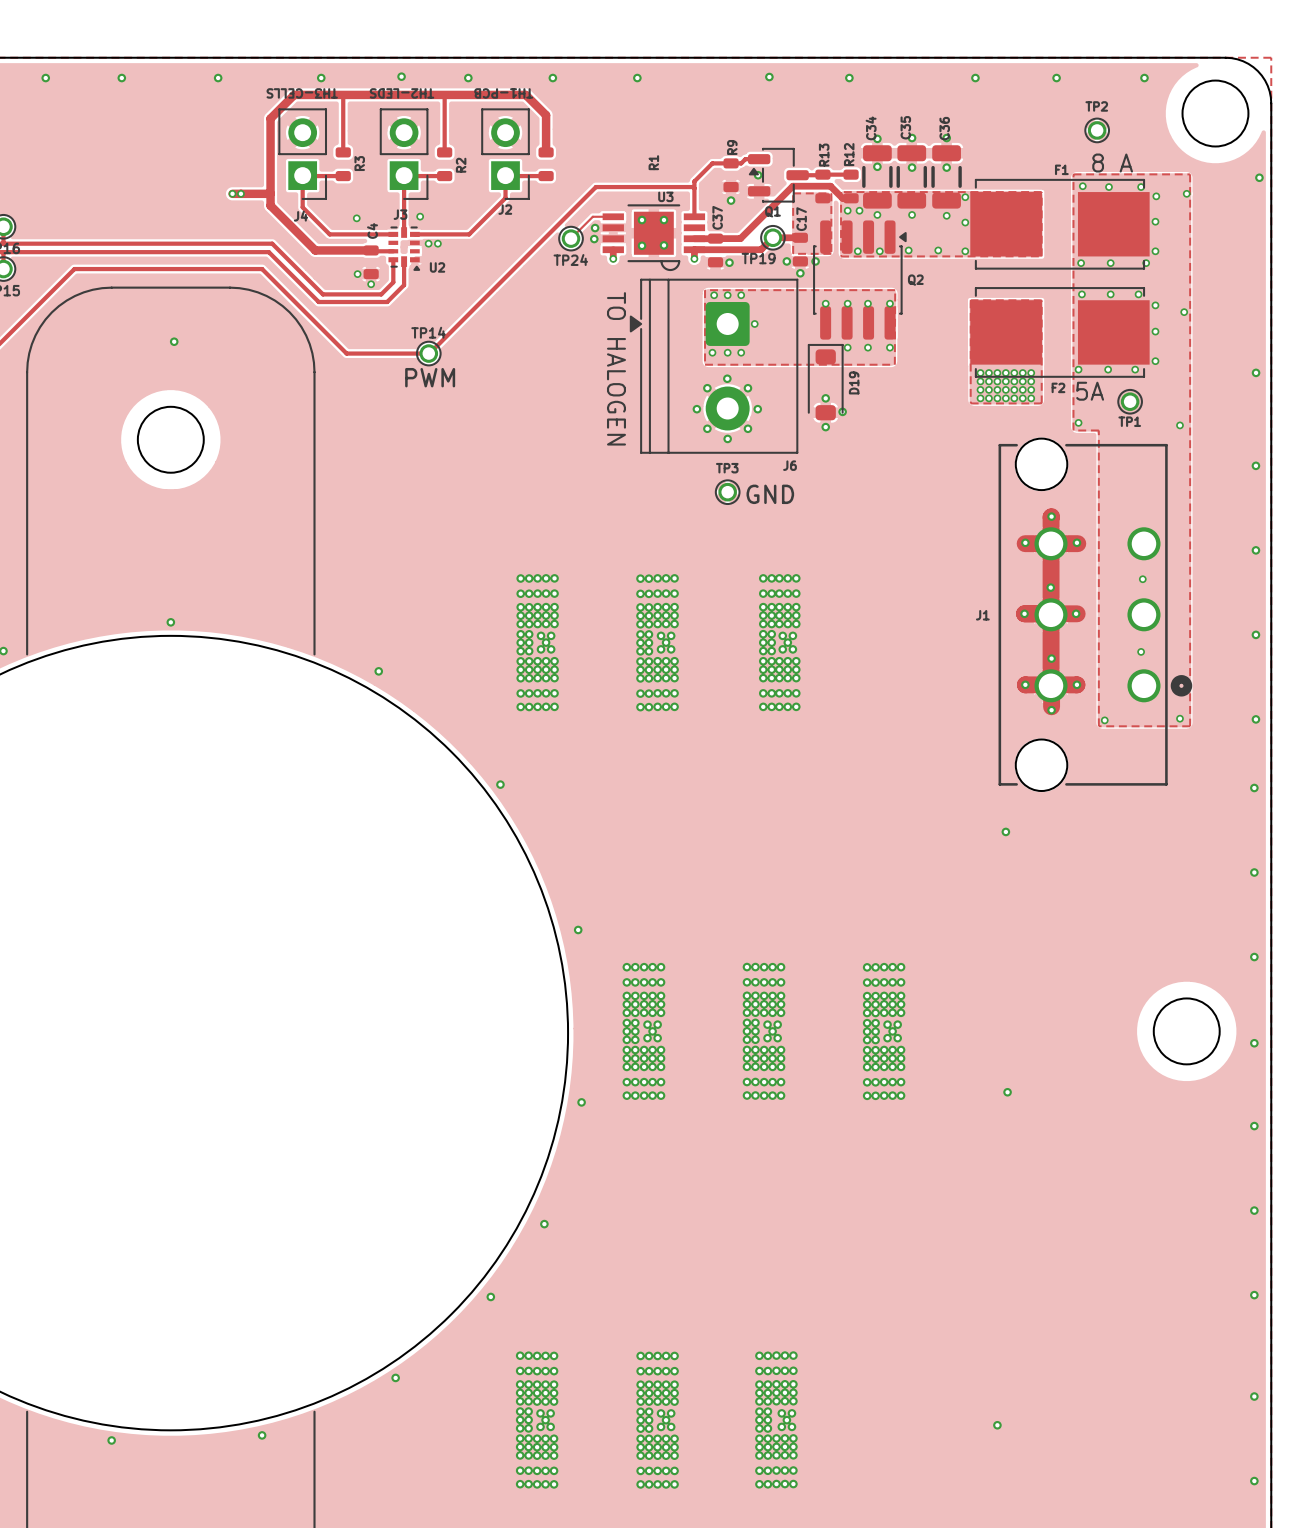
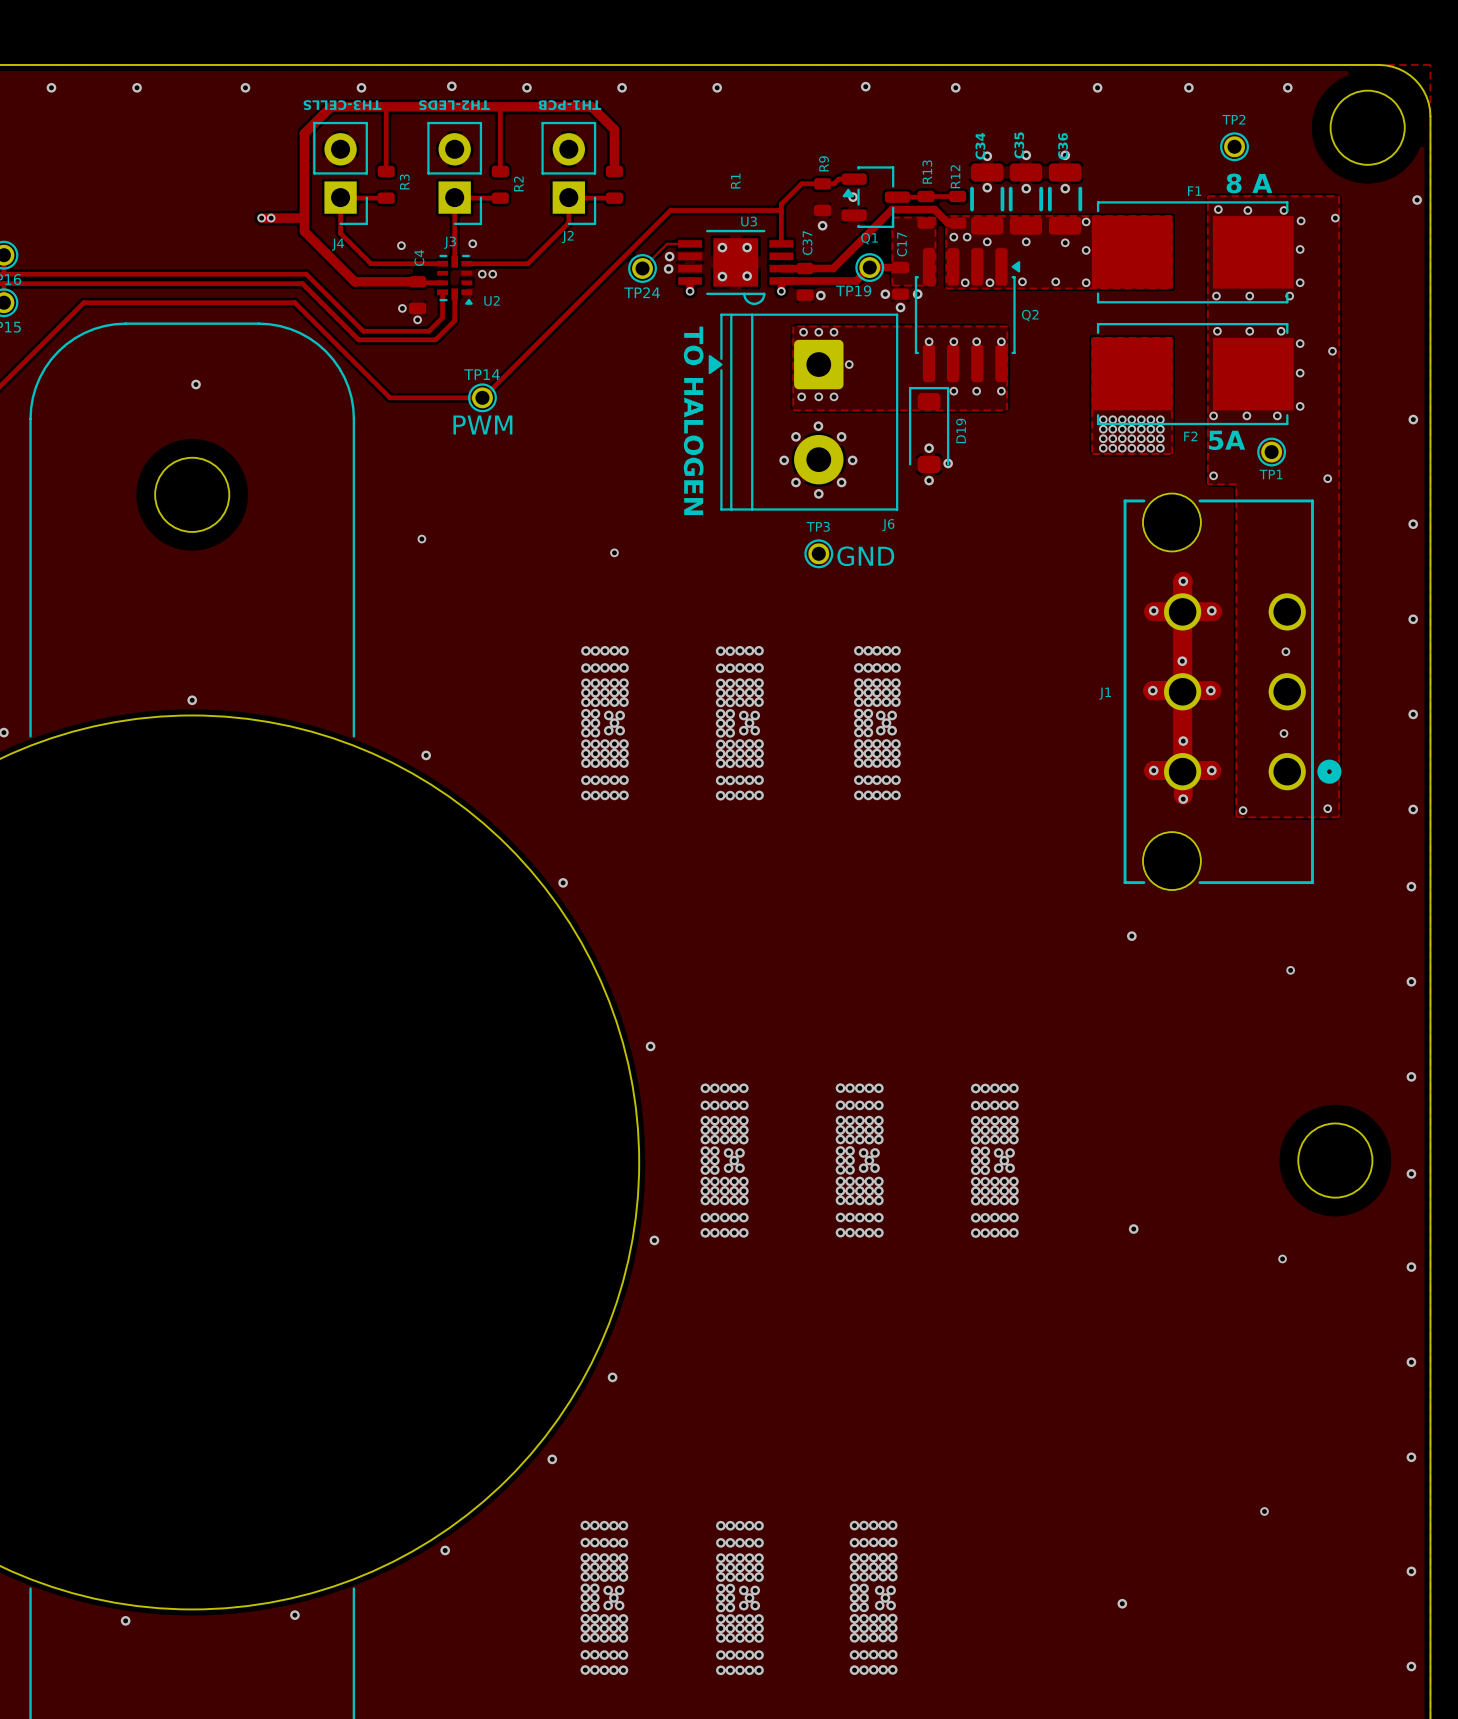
via: none -> (421, 539)
via: none -> (614, 552)
via: none -> (1290, 970)
via: none -> (1282, 1258)
via: none -> (1264, 1511)

